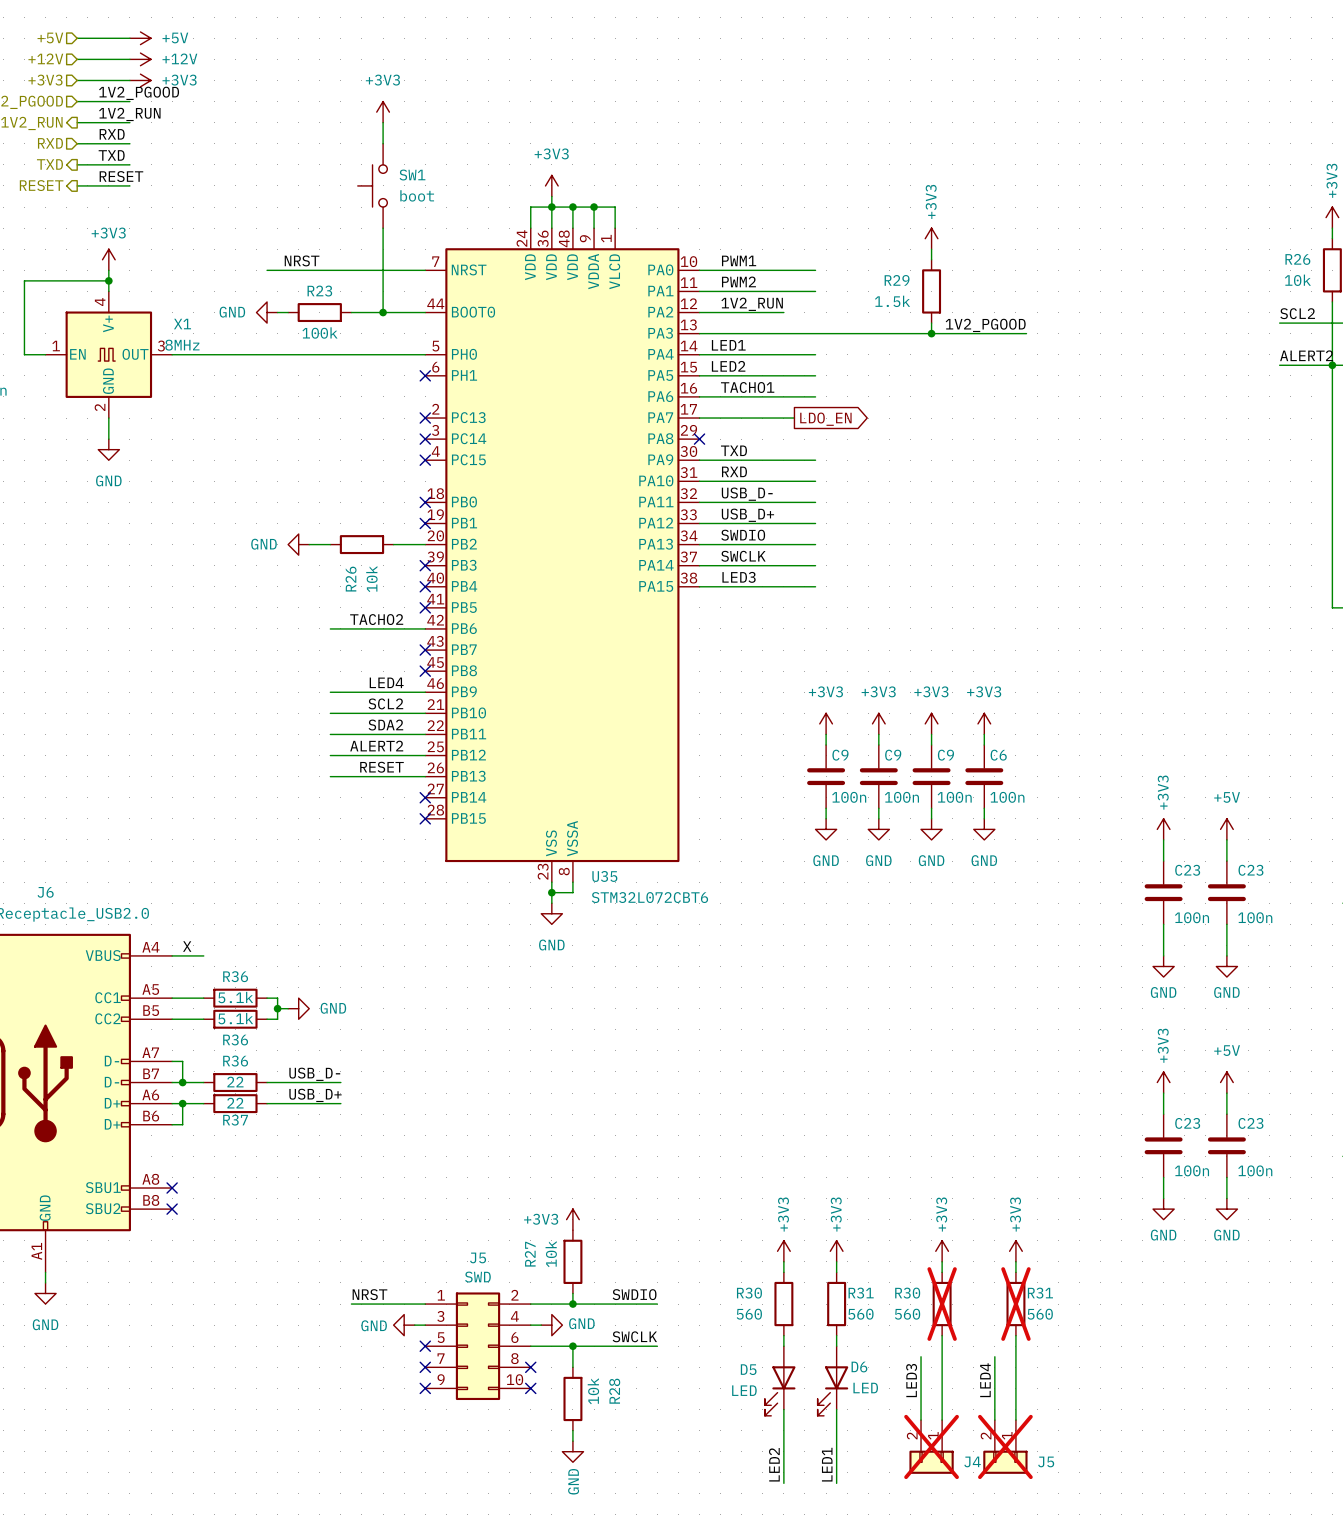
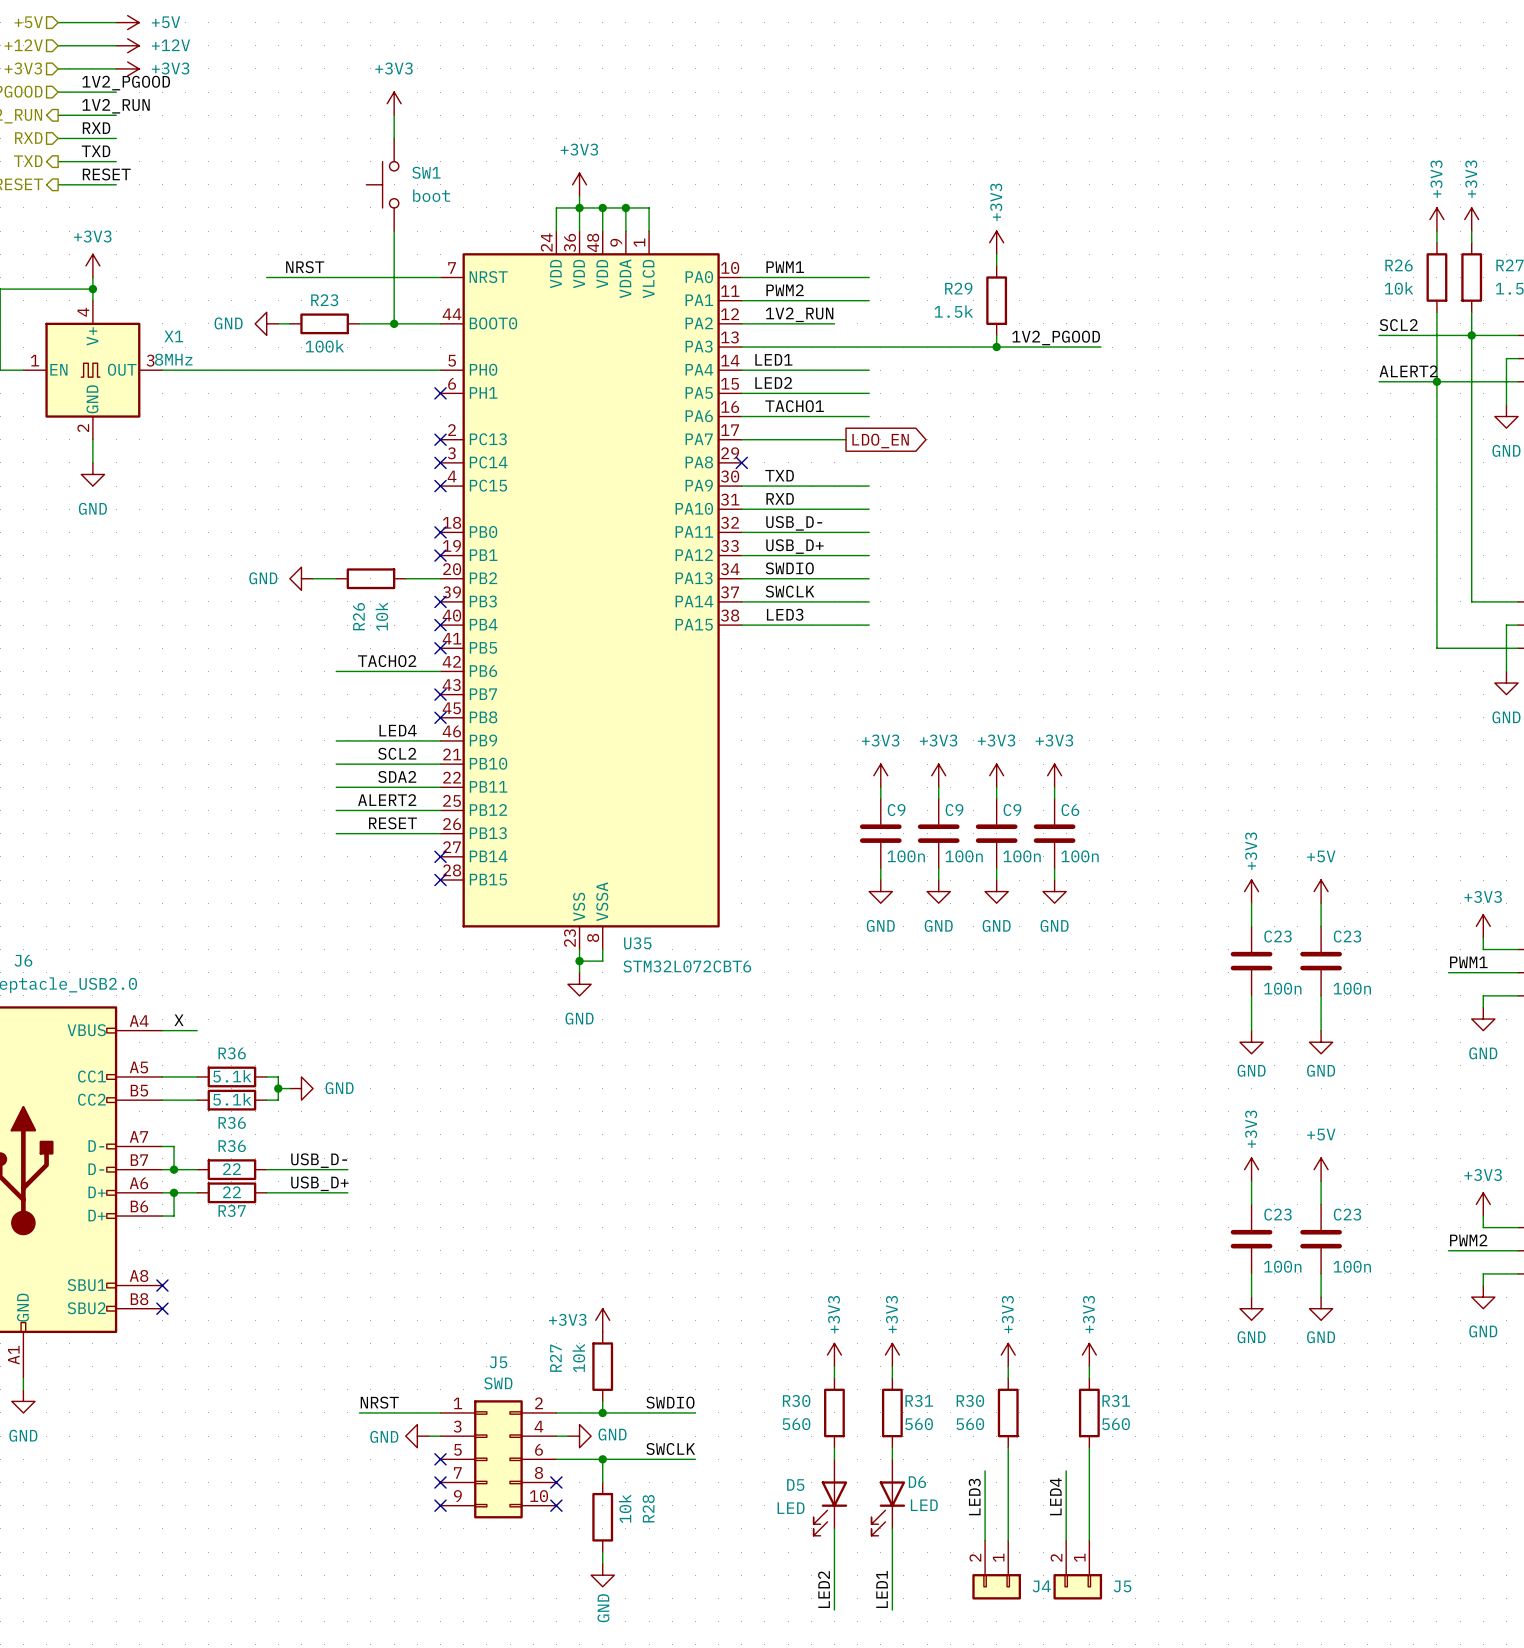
R30 do-not-place cross: (942, 1304) -> none
R31 do-not-place cross: (1015, 1304) -> none
J4 do-not-place cross: (931, 1446) -> none
J5 do-not-place cross: (1005, 1446) -> none

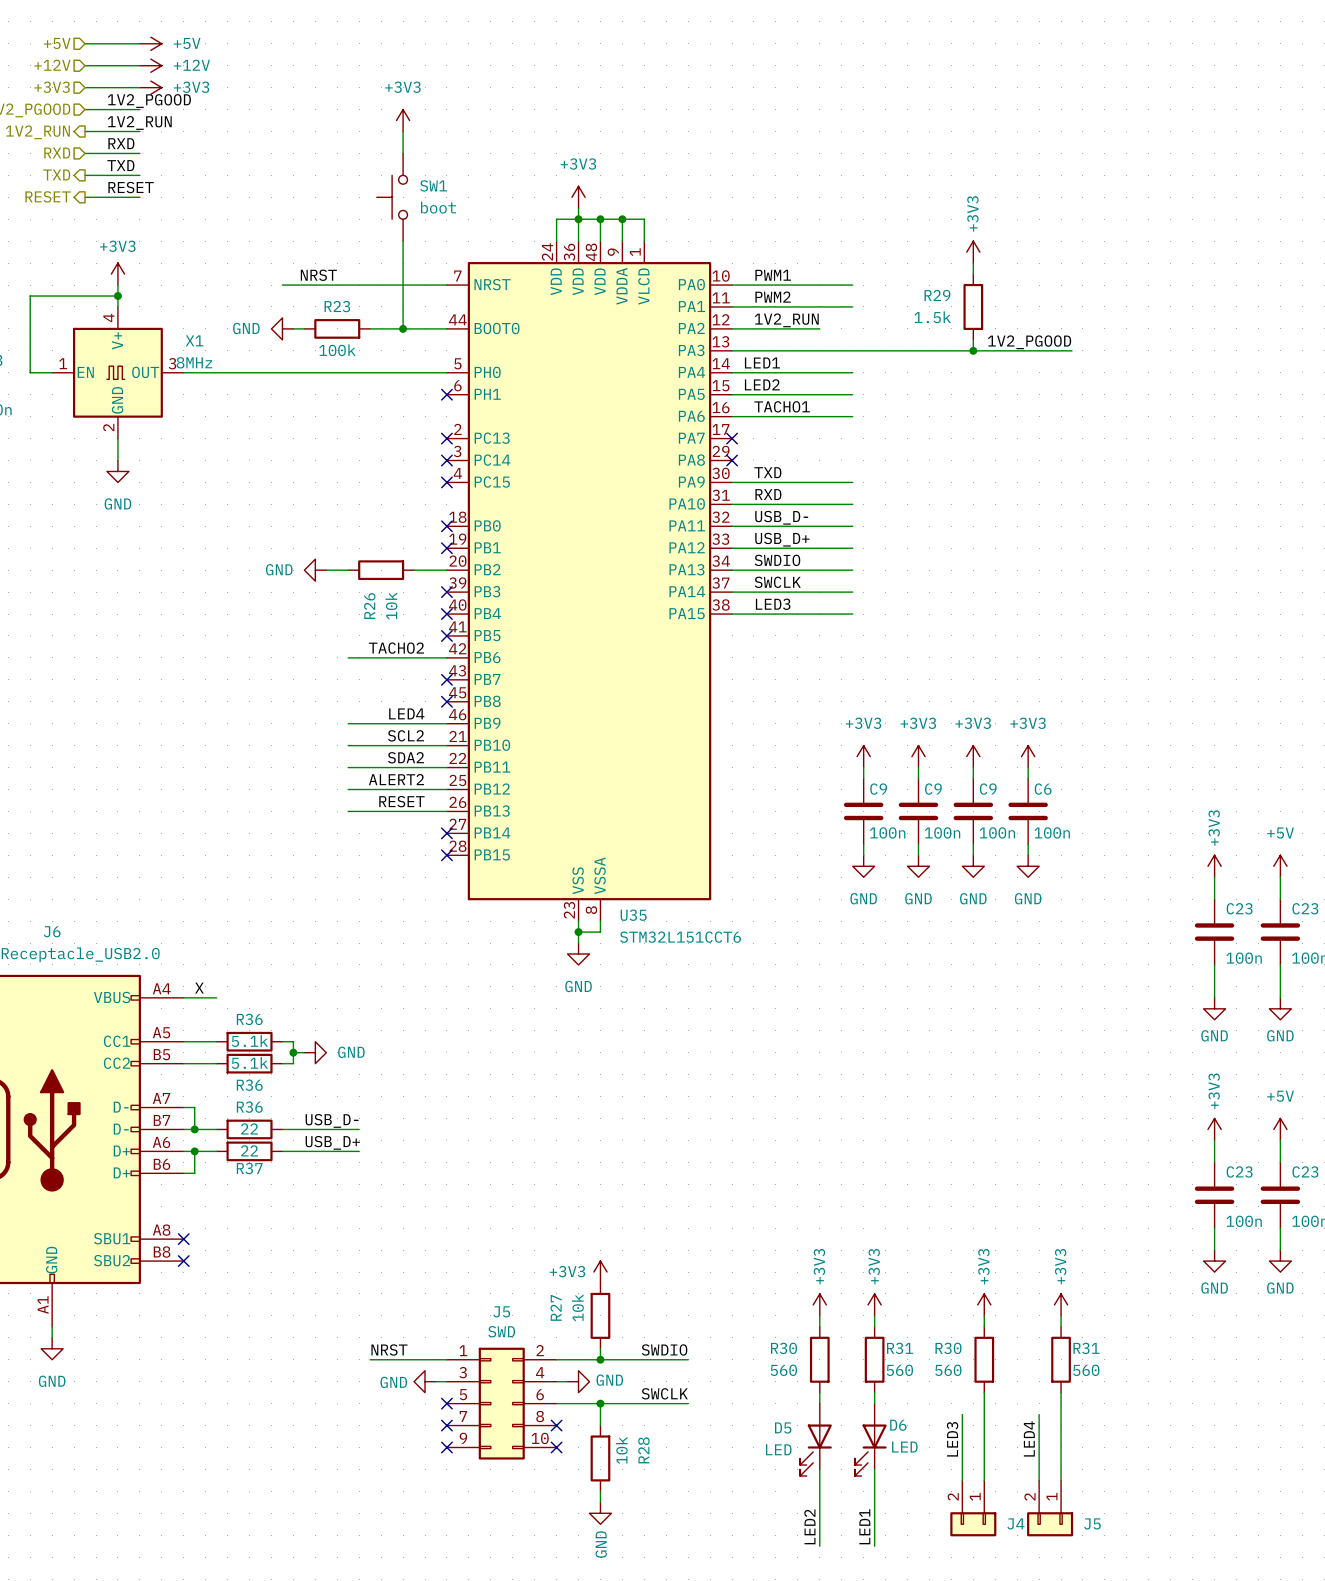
wire: (741, 439) (846, 439) -> none
no-connect mark: none -> (732, 438)
global label: LDO_EN (880, 441) -> none
U35 value: STM32L072CBT6 (687, 966) -> STM32L151CCT6 (680, 937)

